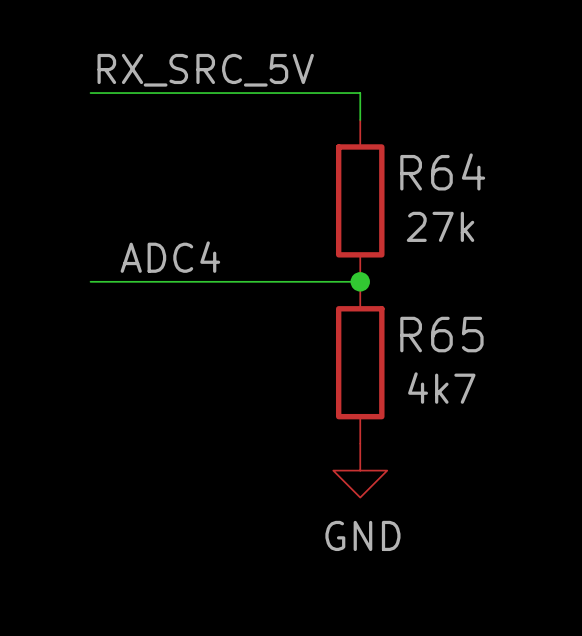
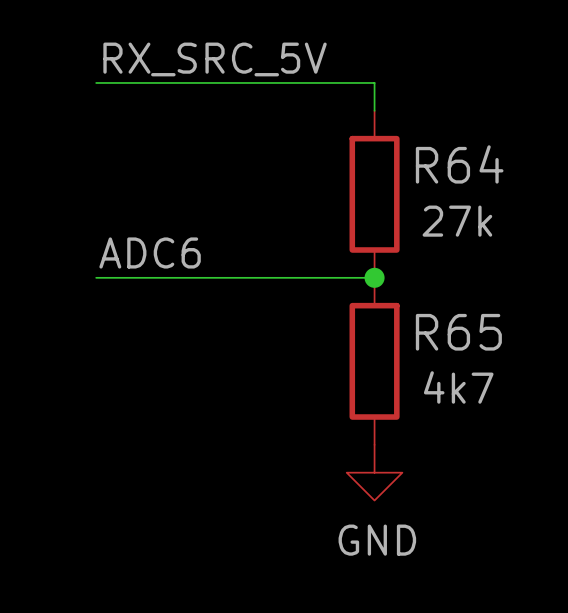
label: ADC4 (170, 257) -> ADC6 (150, 252)

